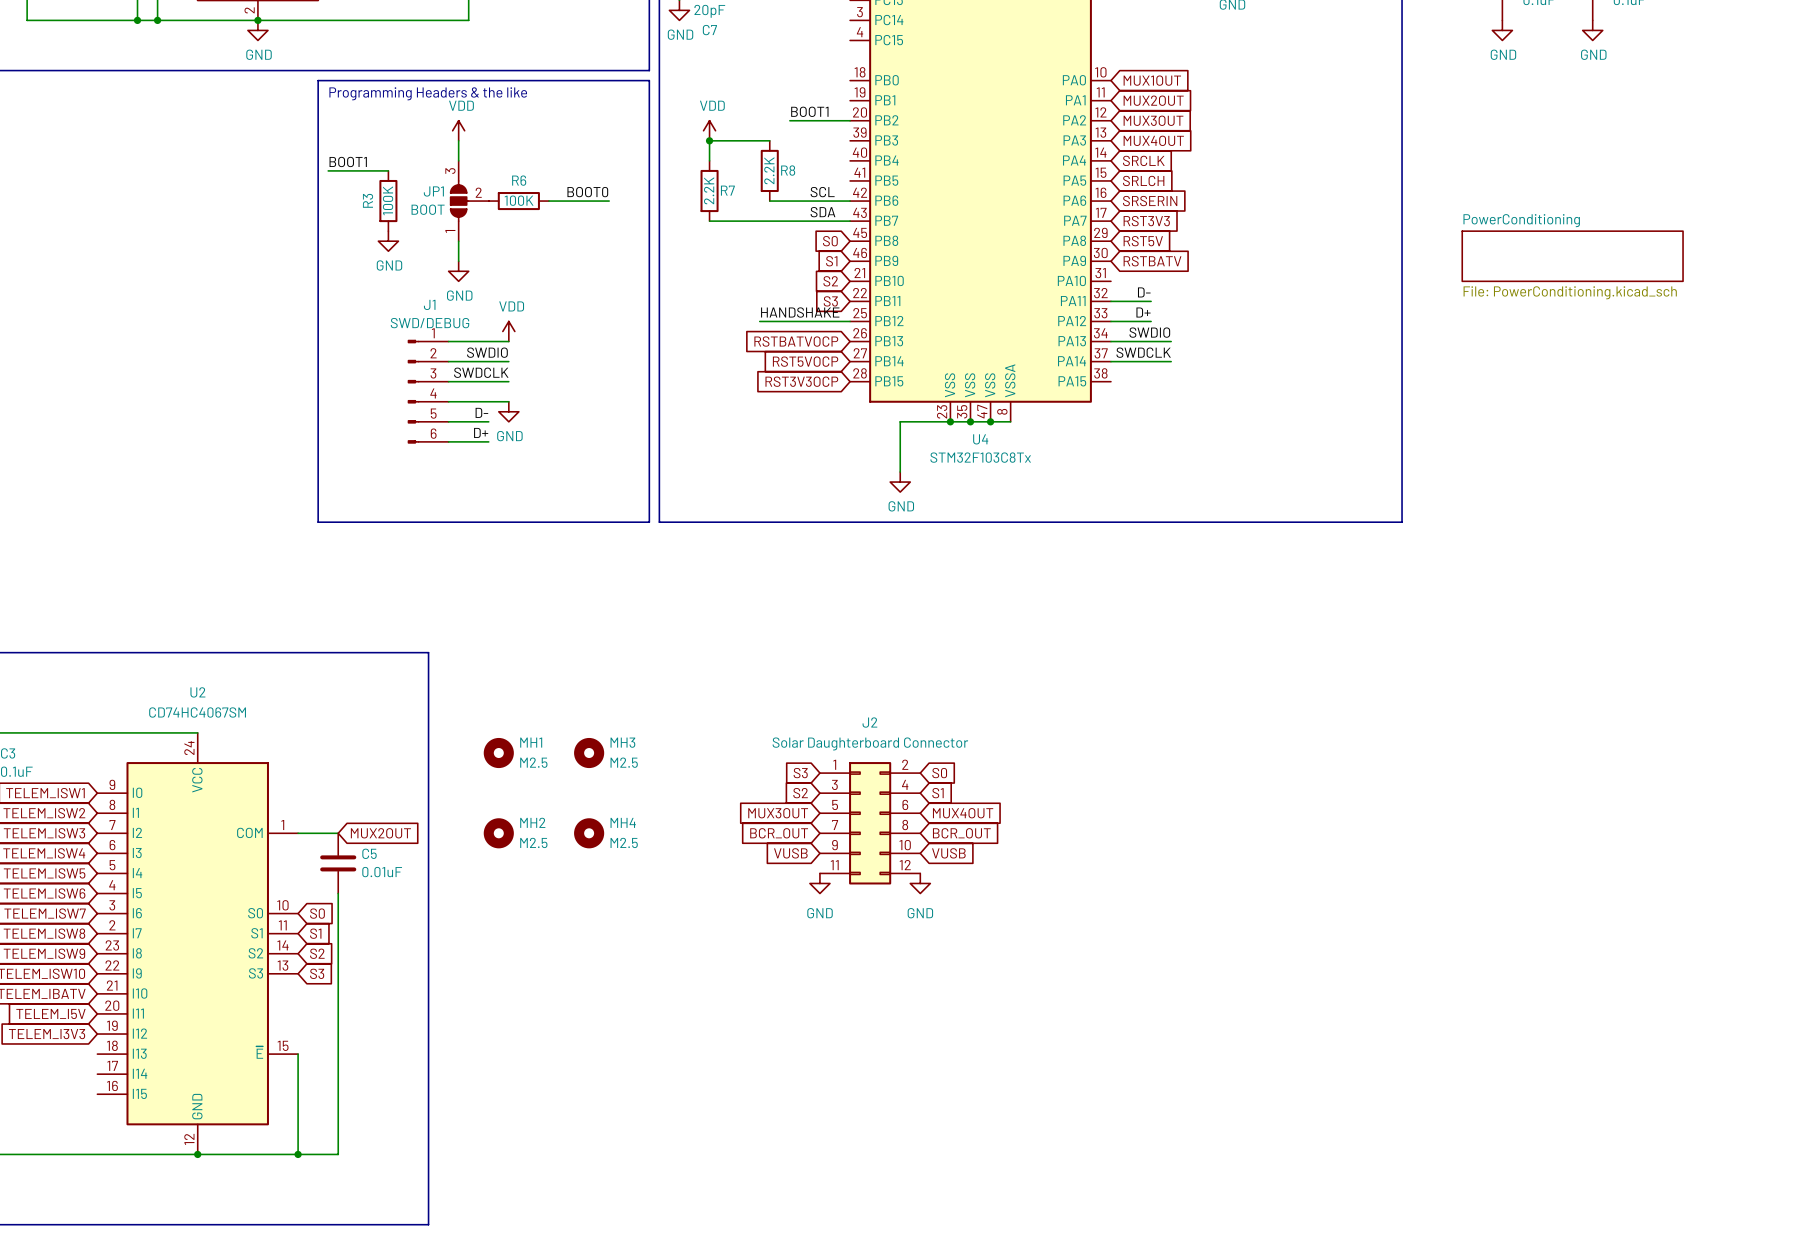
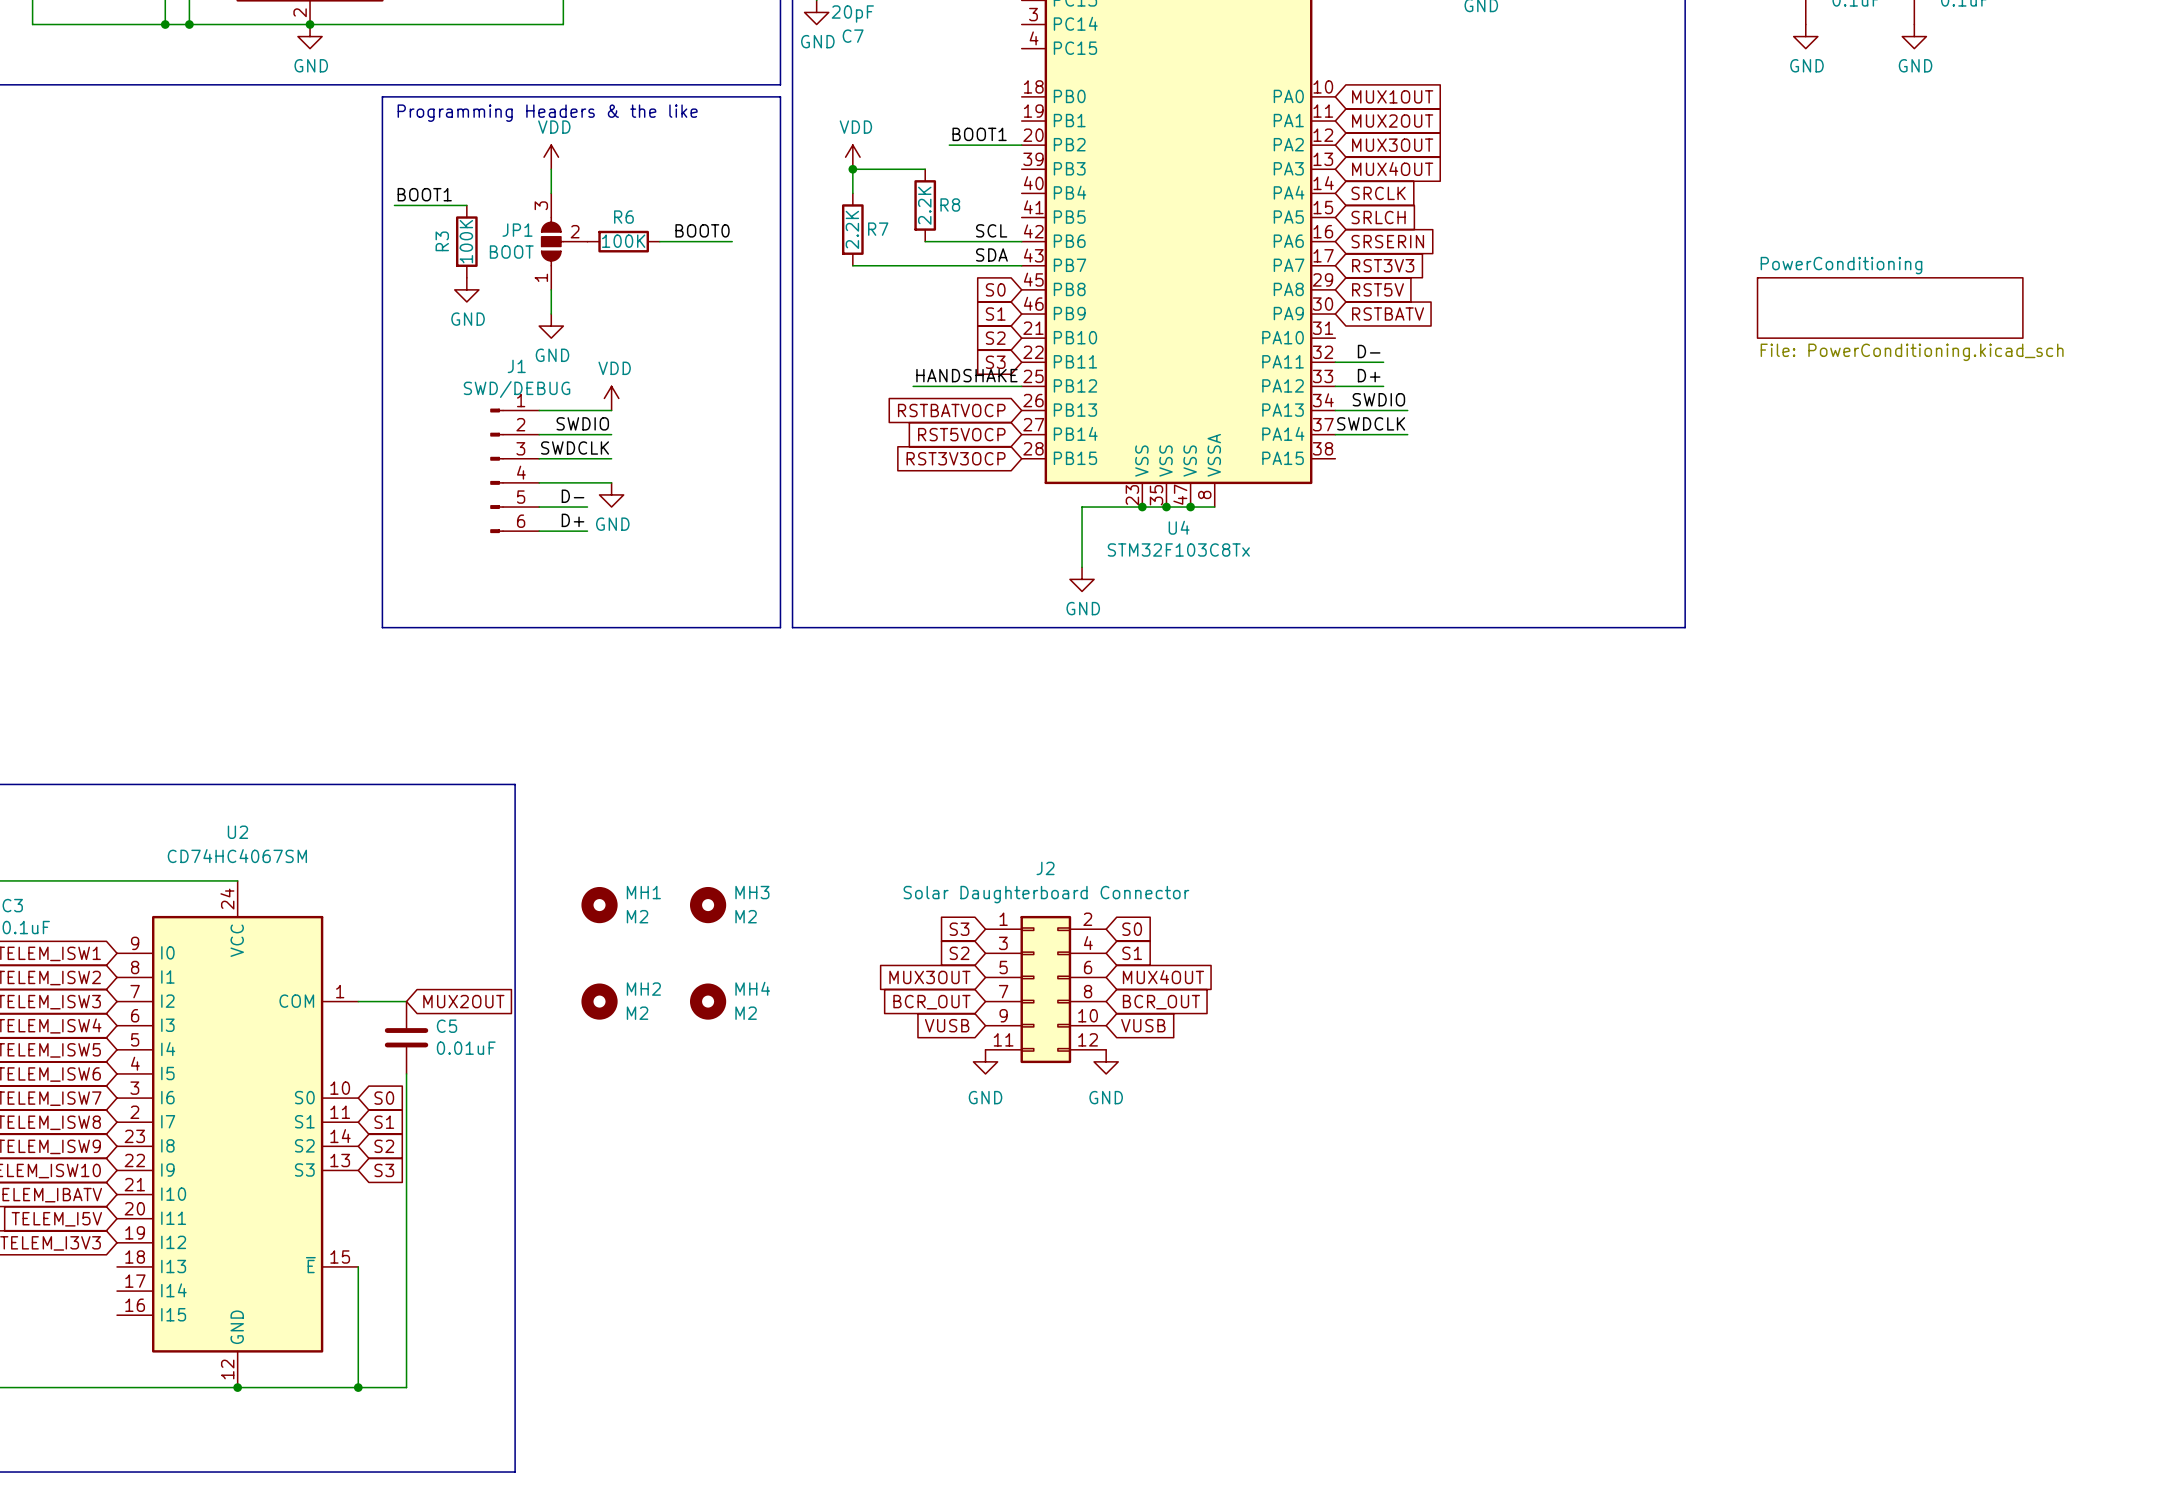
MH1 value: M2.5 (533, 762) -> M2 (637, 916)
MH3 value: M2.5 (624, 762) -> M2 (746, 916)
MH2 value: M2.5 (533, 842) -> M2 (637, 1013)
MH4 value: M2.5 (624, 842) -> M2 (746, 1013)

